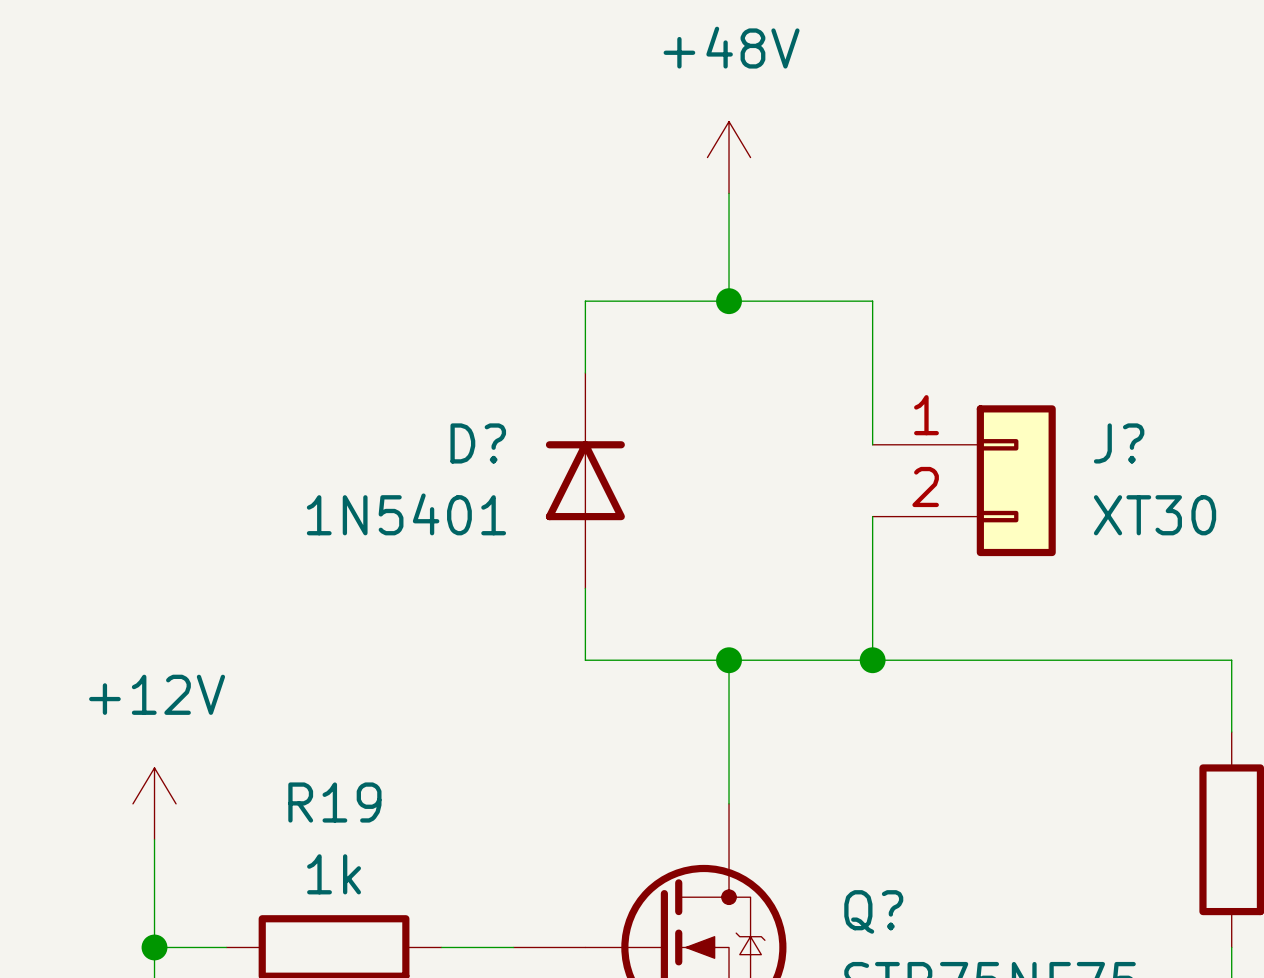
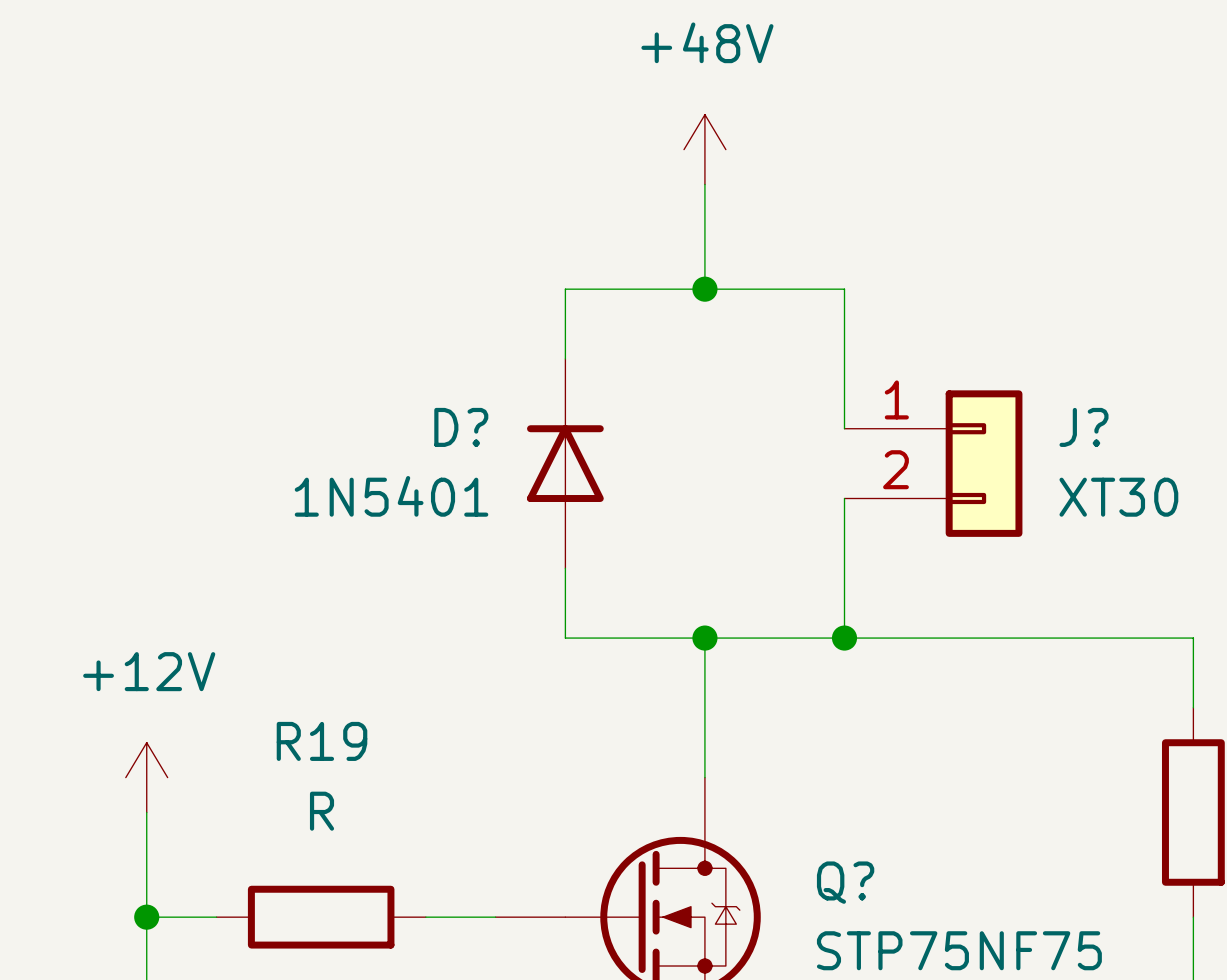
R19 name position: R19 (334, 802) -> R19 (322, 741)
R19 value: 1k (334, 874) -> R (322, 811)

